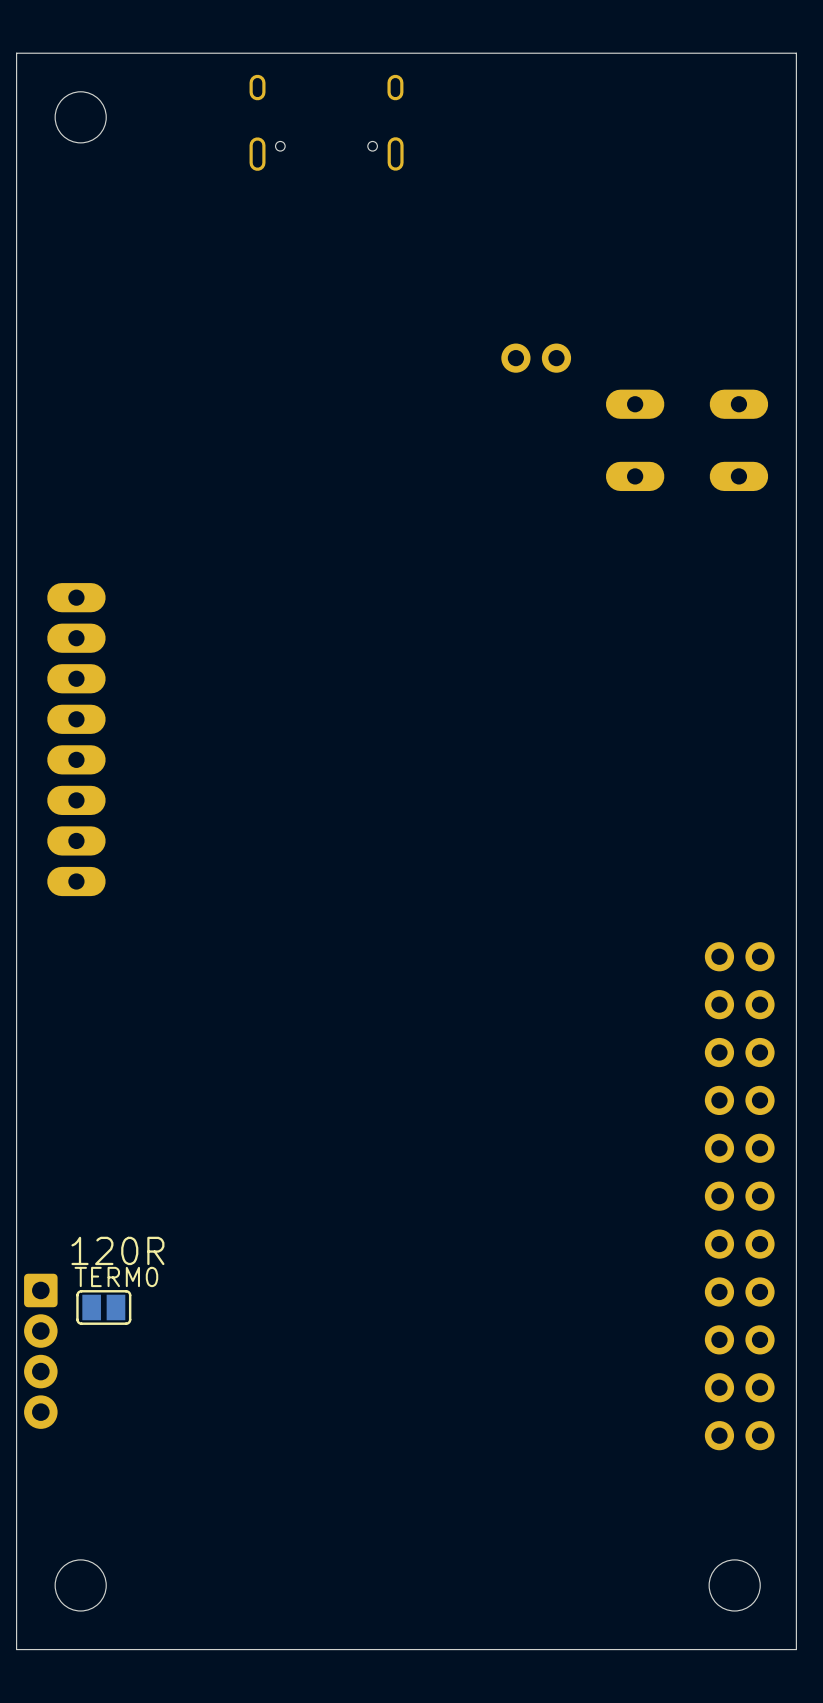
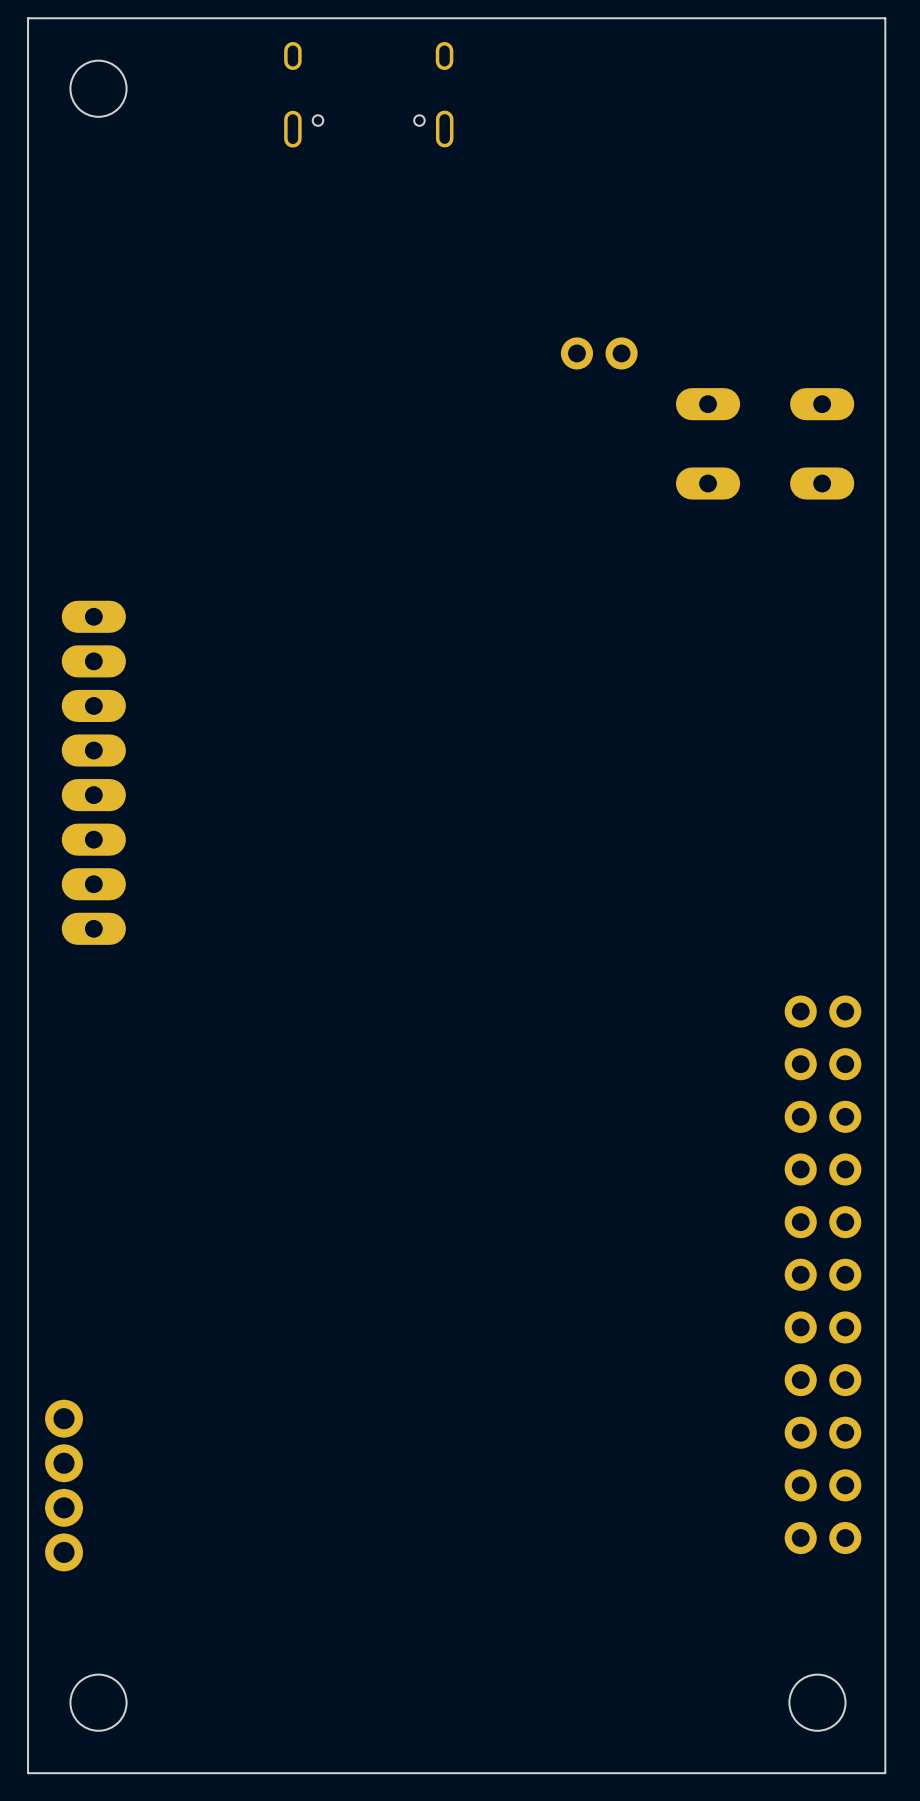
text: 120R (117, 1250) -> none
TERM0: (103, 1307) -> none
part: (40, 1351) -> none
part: none -> (64, 1485)

